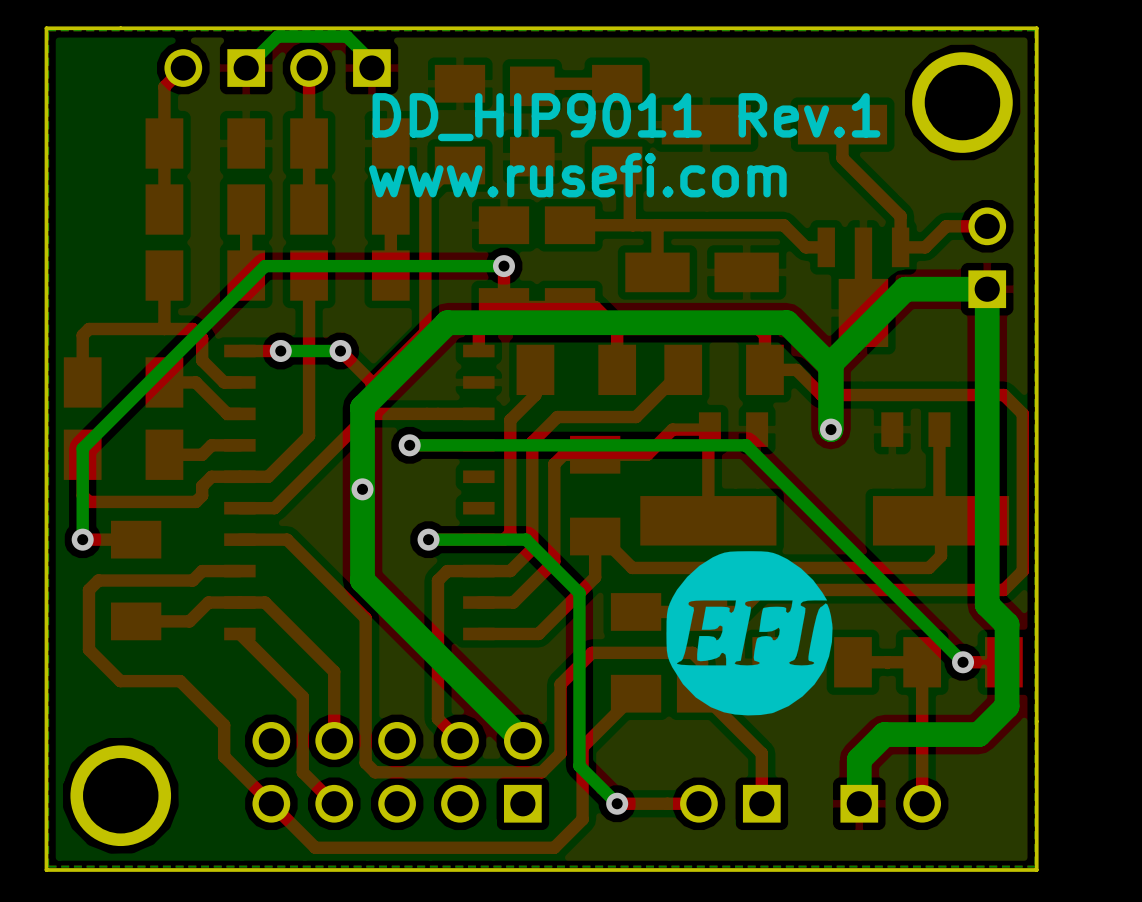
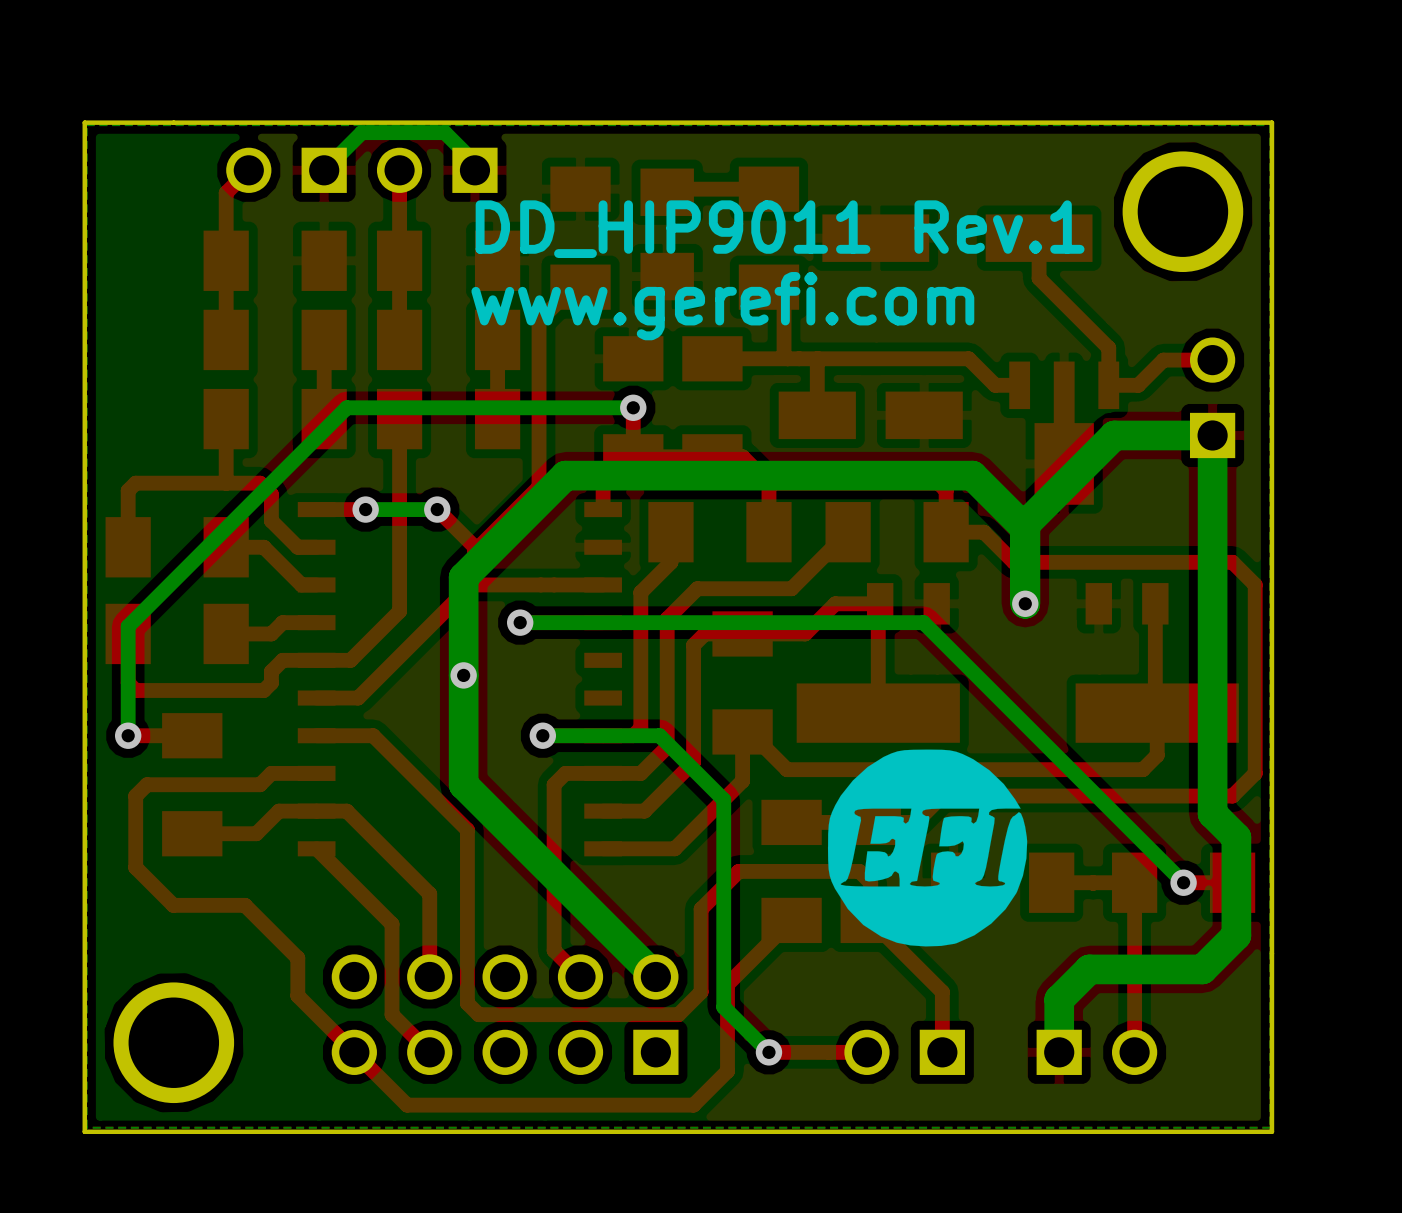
text: www.rusefi.com (577, 175) -> www.gerefi.com (722, 306)

